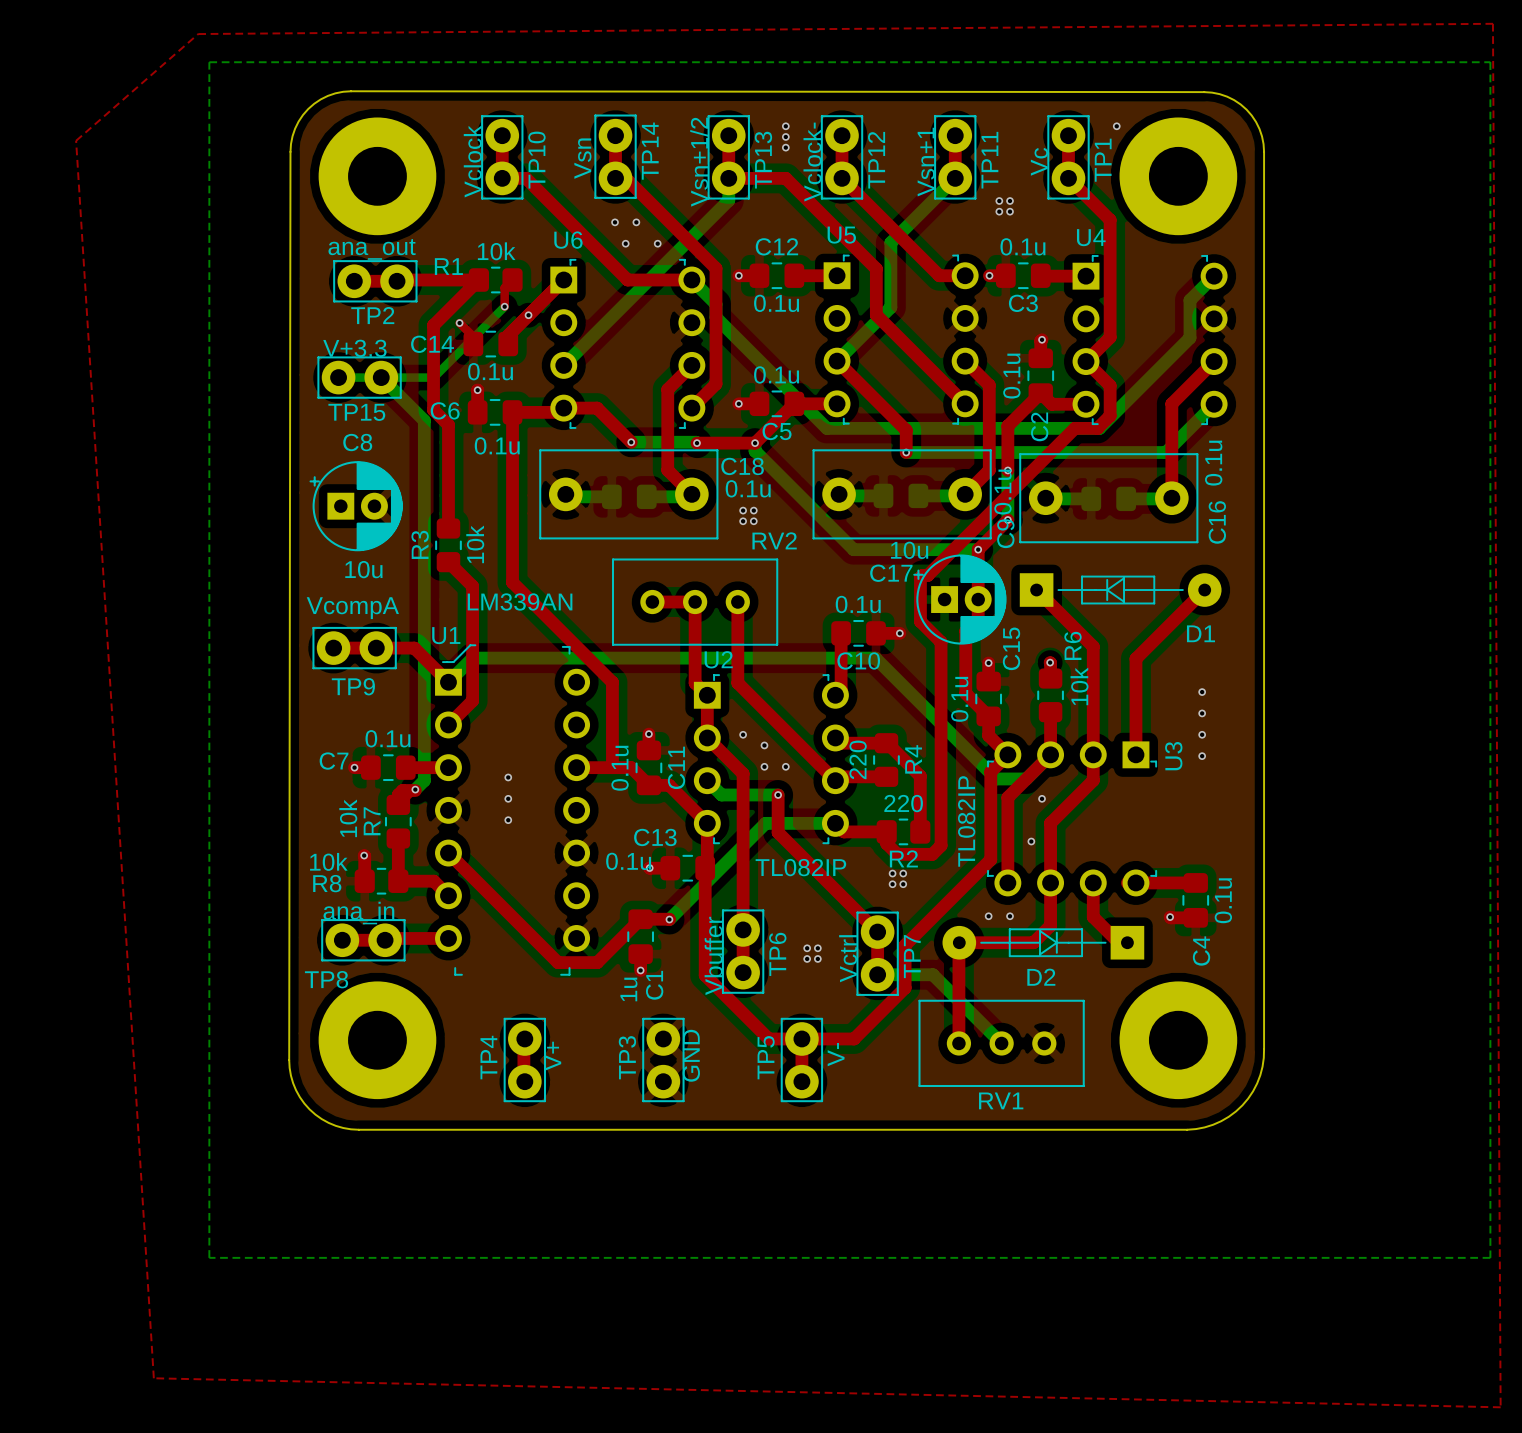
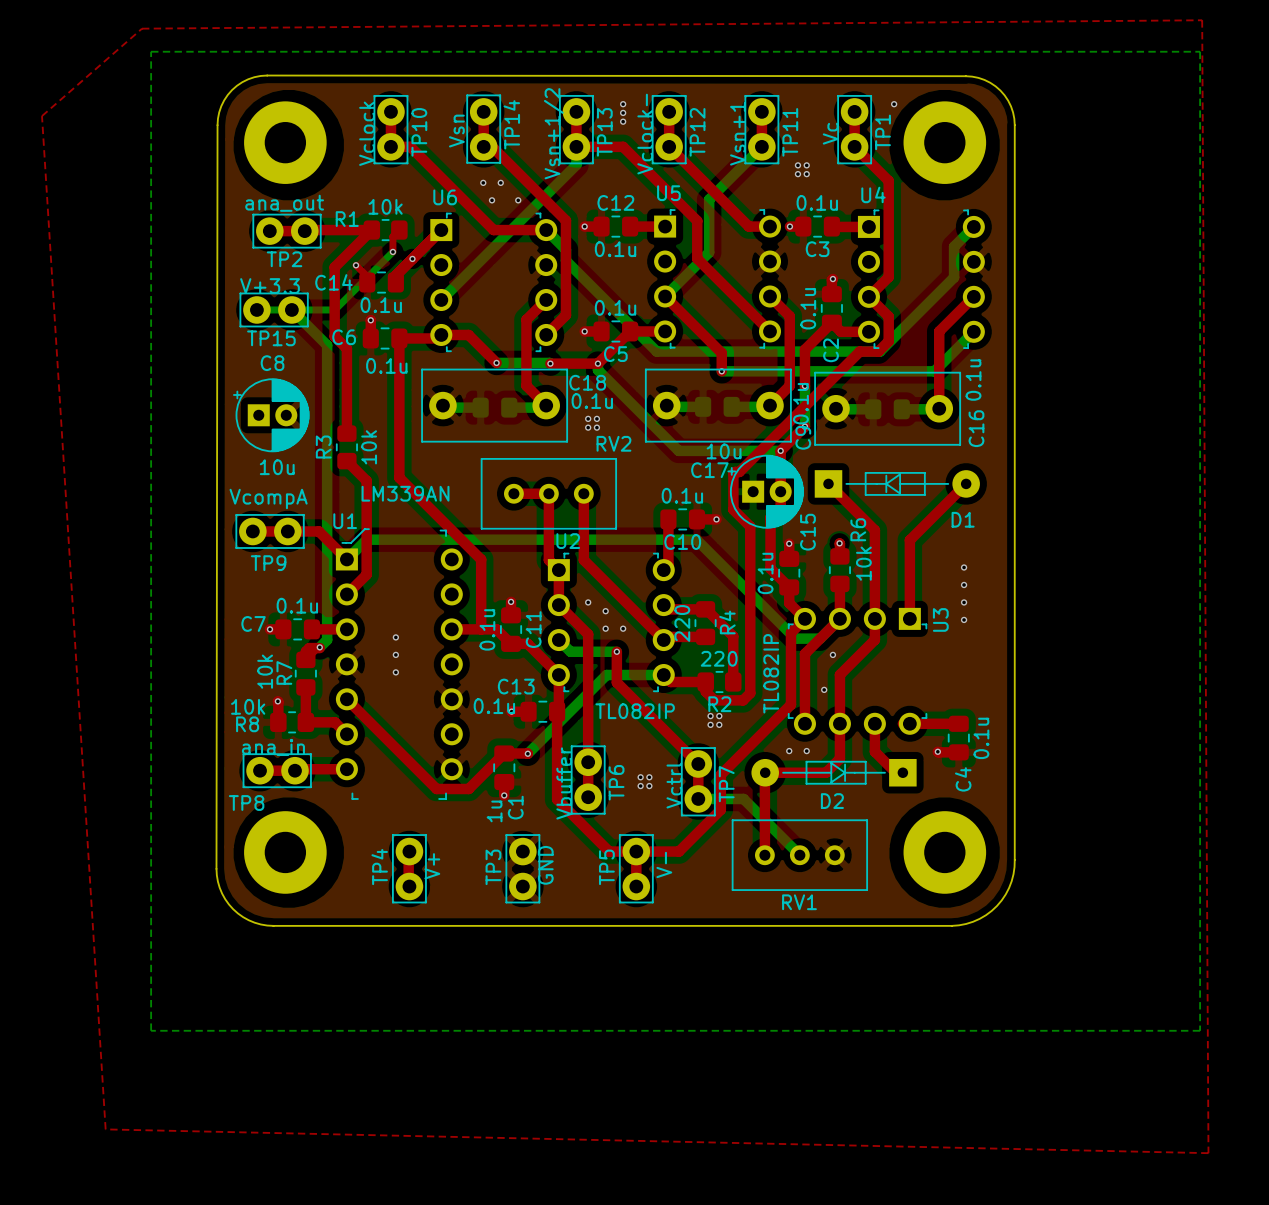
part footprint: [318, 117, 437, 236] -> [244, 101, 327, 184]
part footprint: [1119, 117, 1238, 236] -> [903, 101, 987, 184]
part footprint: [318, 981, 437, 1100] -> [244, 811, 327, 894]
part footprint: [1119, 981, 1238, 1100] -> [903, 811, 987, 894]

